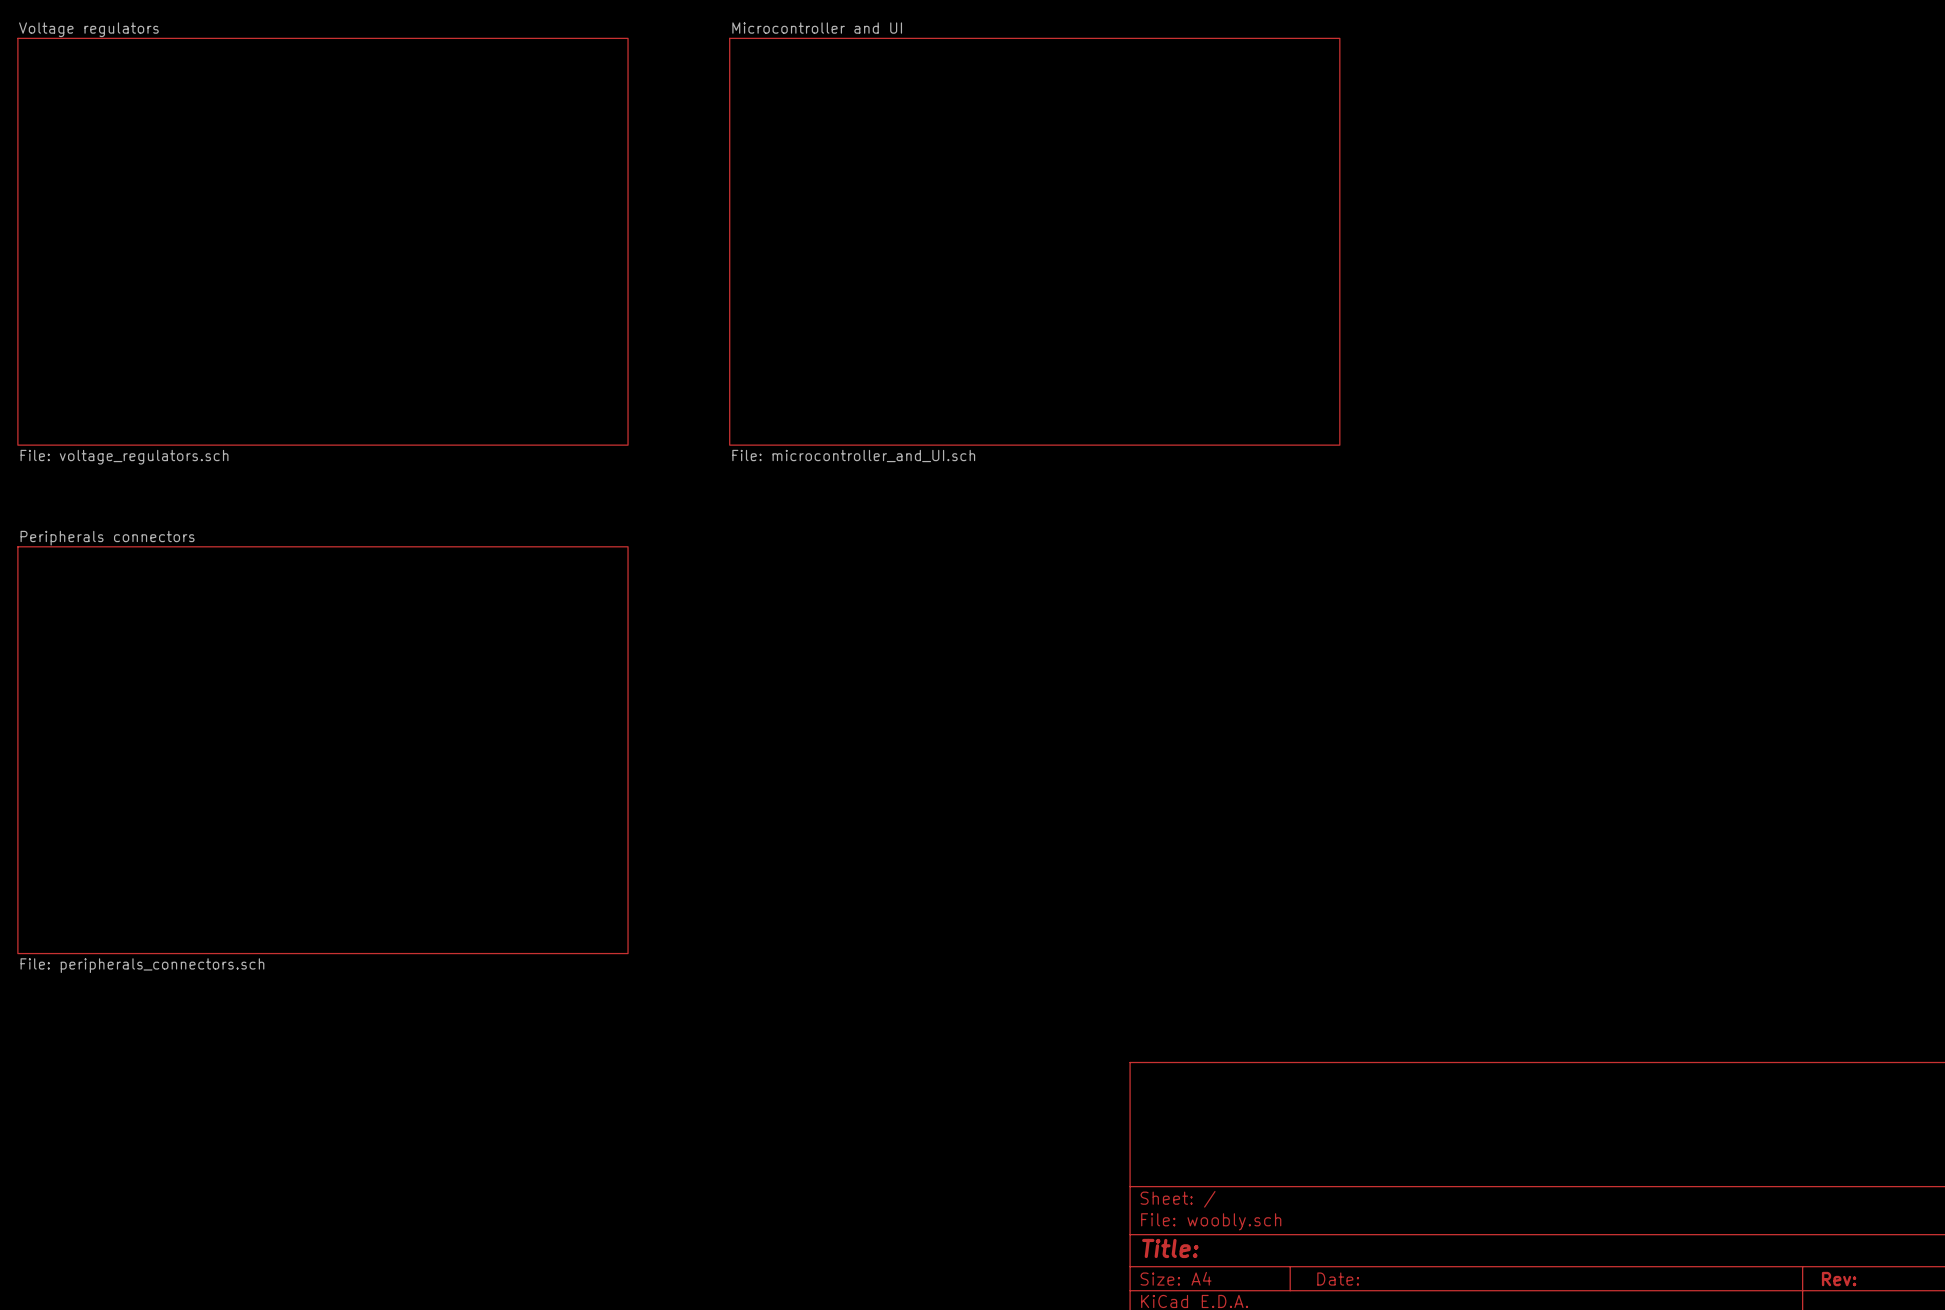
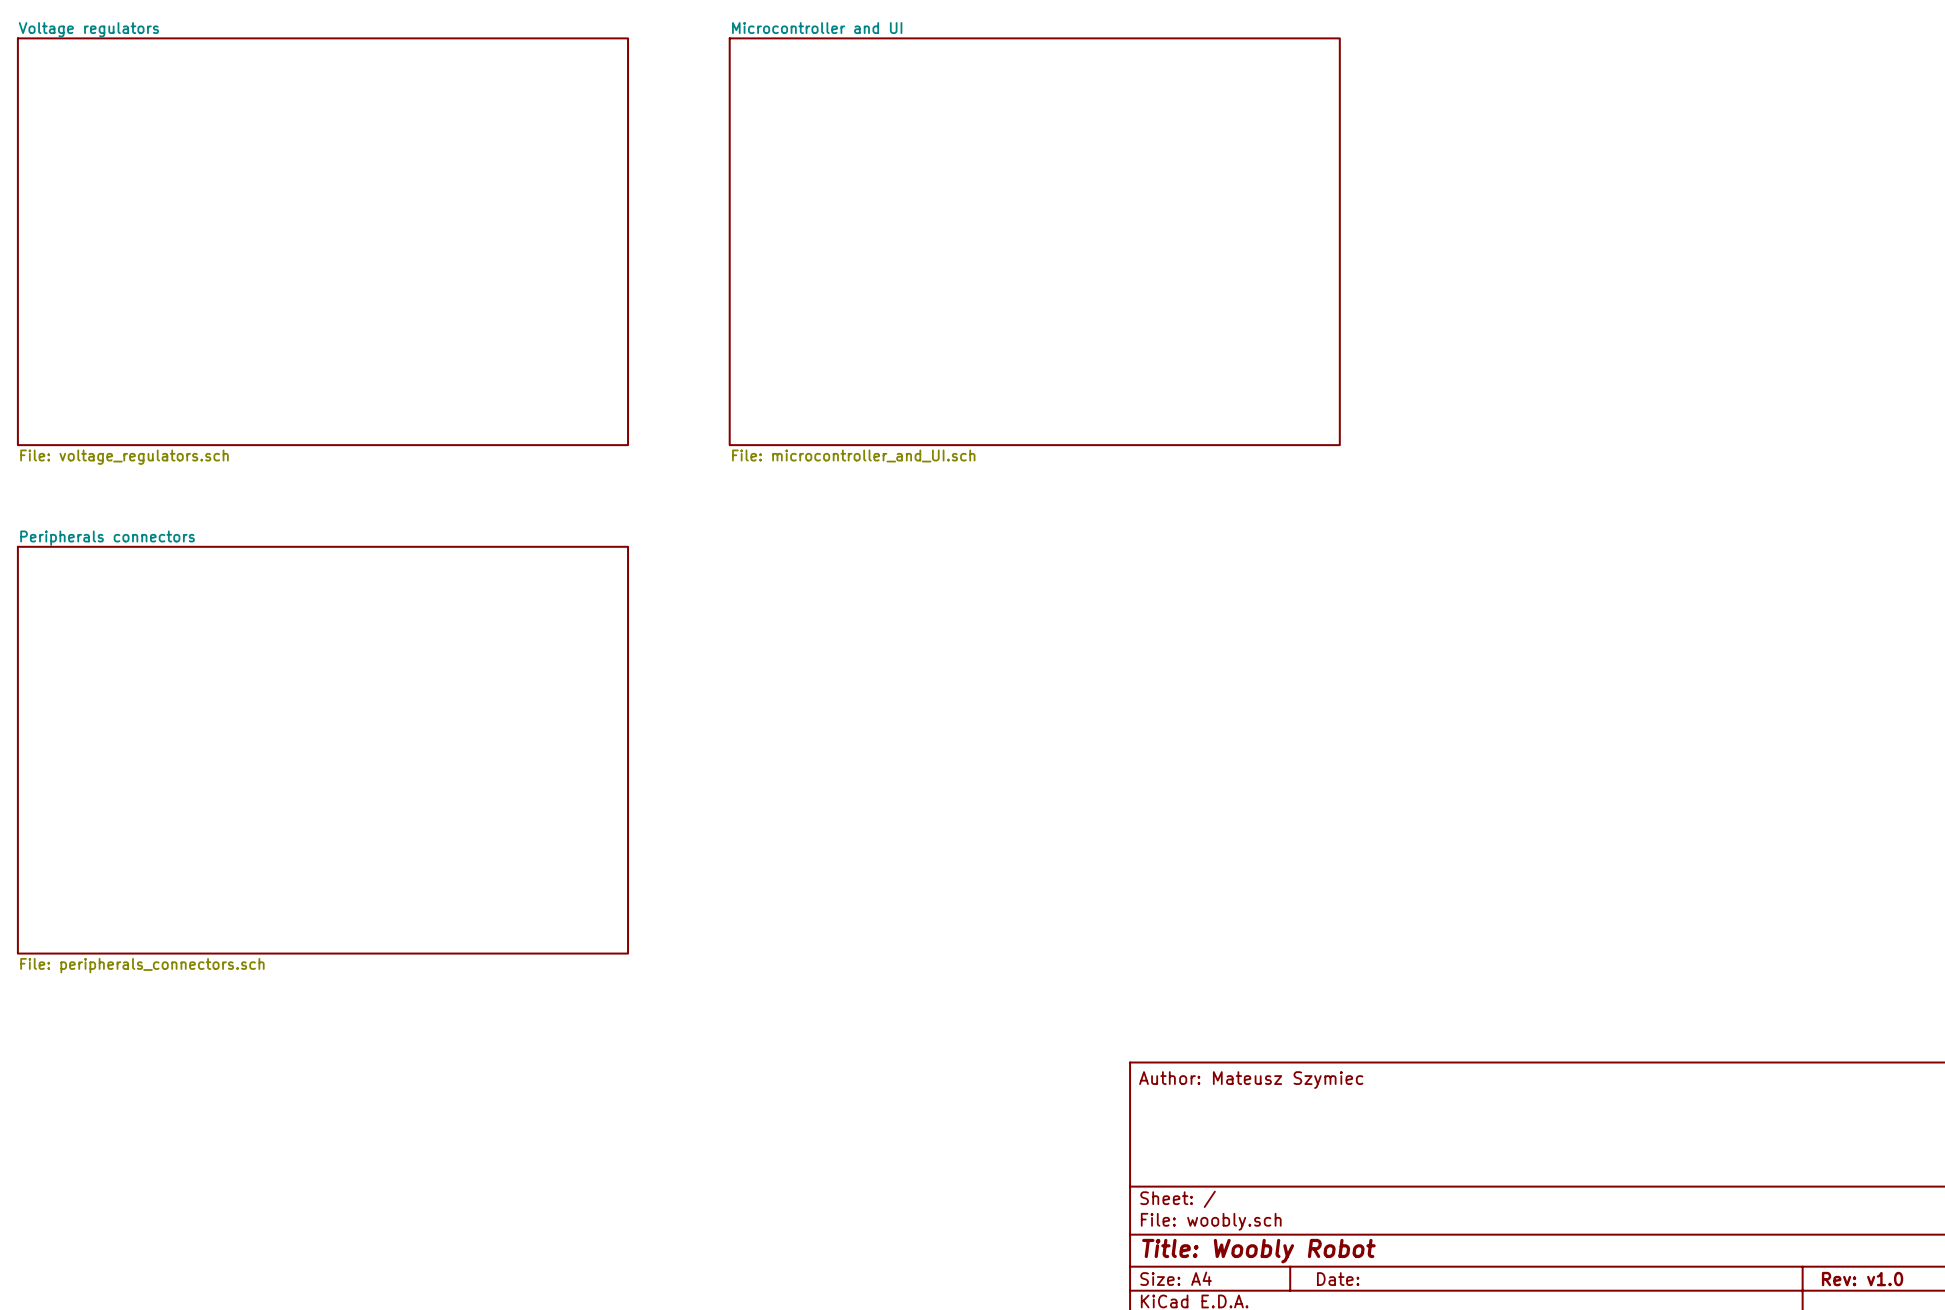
title block: none -> Author: Mateusz Szymiec (1251, 1080)
title block: Title: (1170, 1248) -> Title: Woobly Robot (1258, 1251)
title block: Rev: (1839, 1279) -> Rev: v1.0 (1862, 1279)

